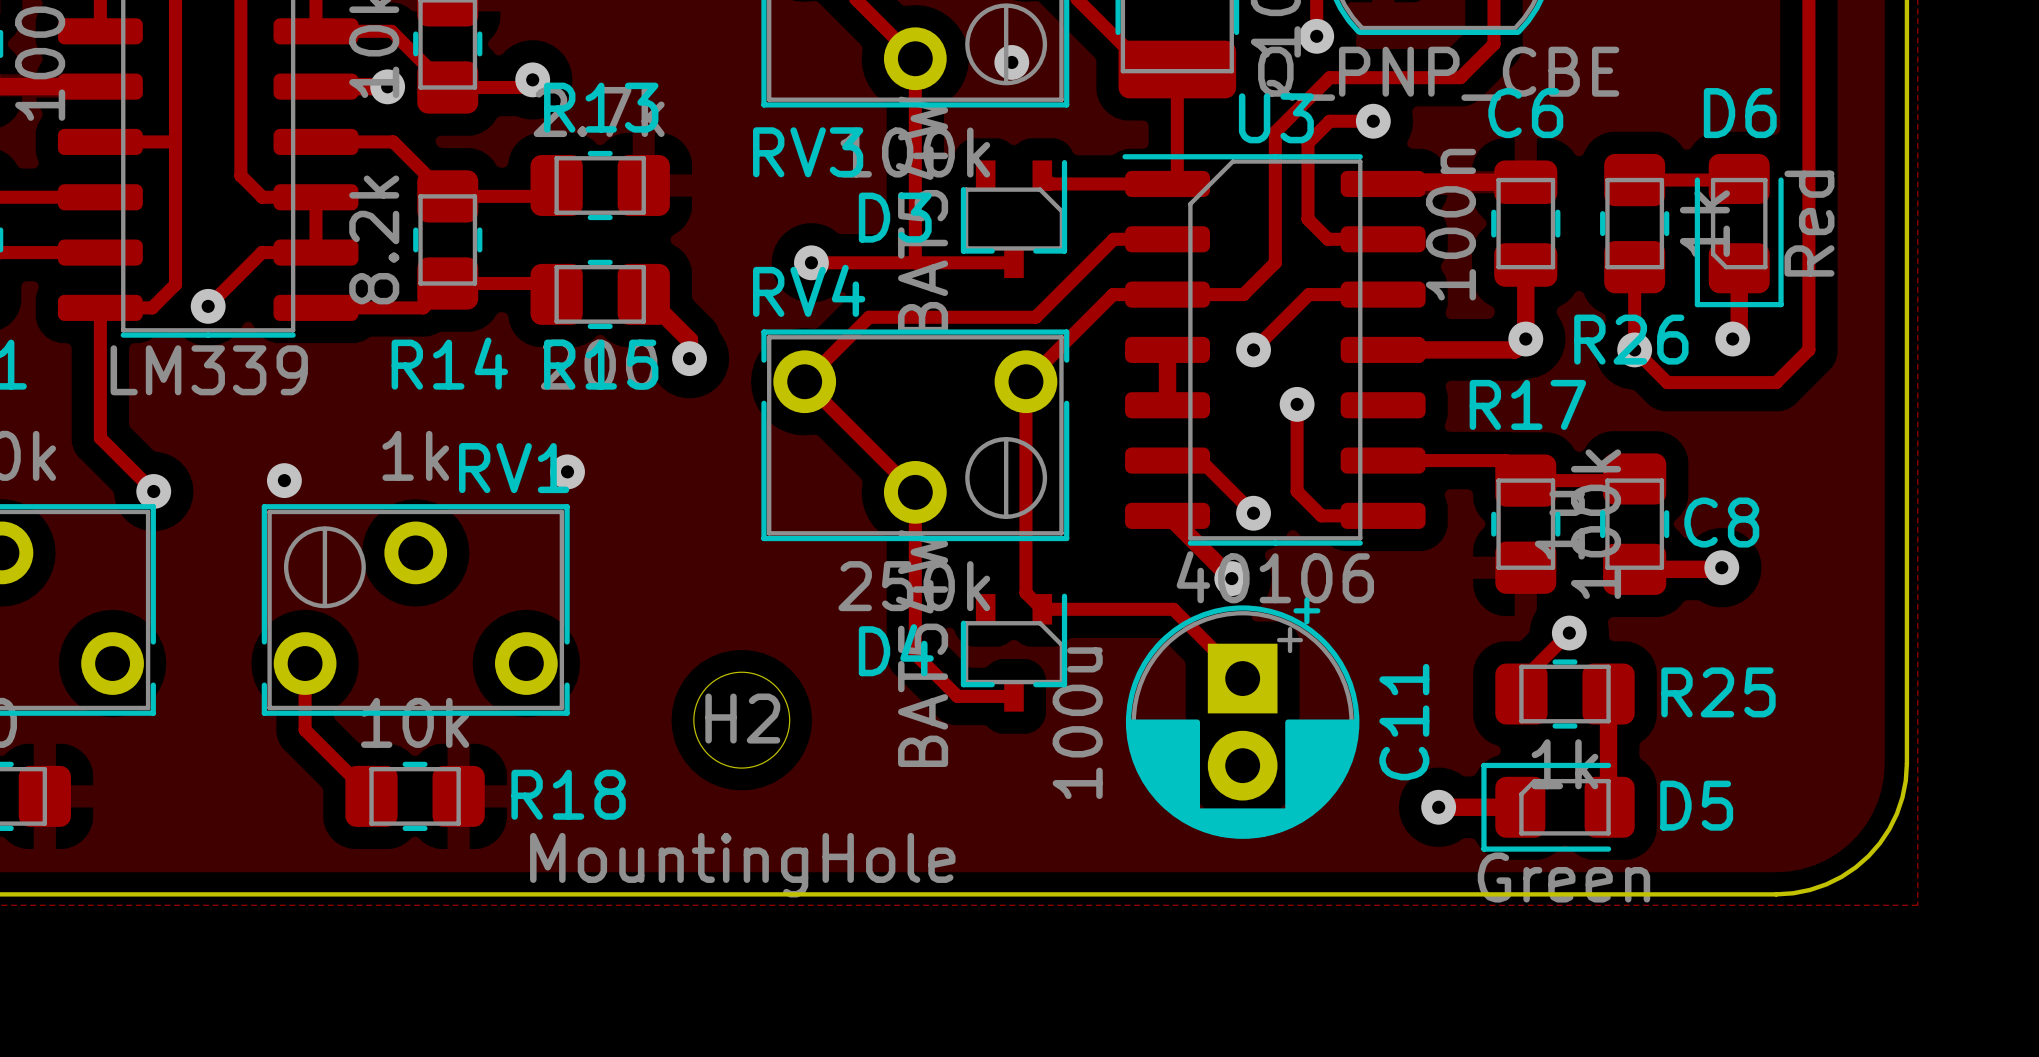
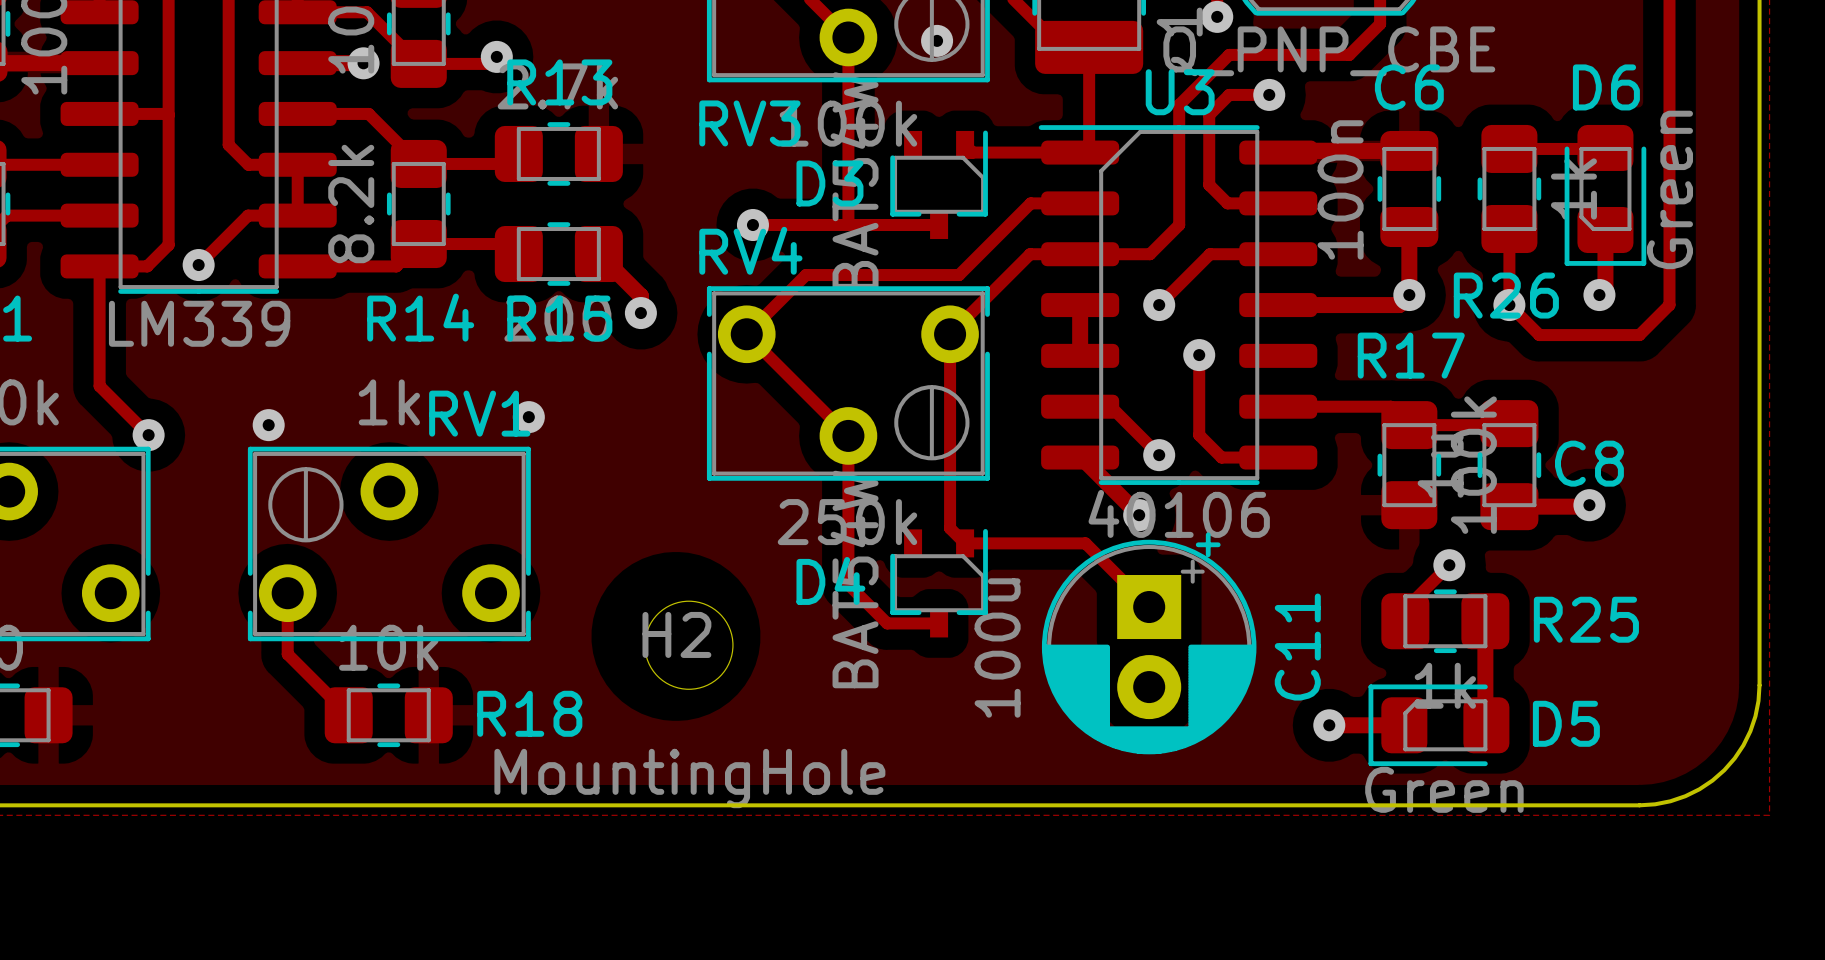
D6 value: Red (1809, 223) -> Green (1669, 189)
H2 name position: H2 (742, 718) -> H2 (676, 634)

